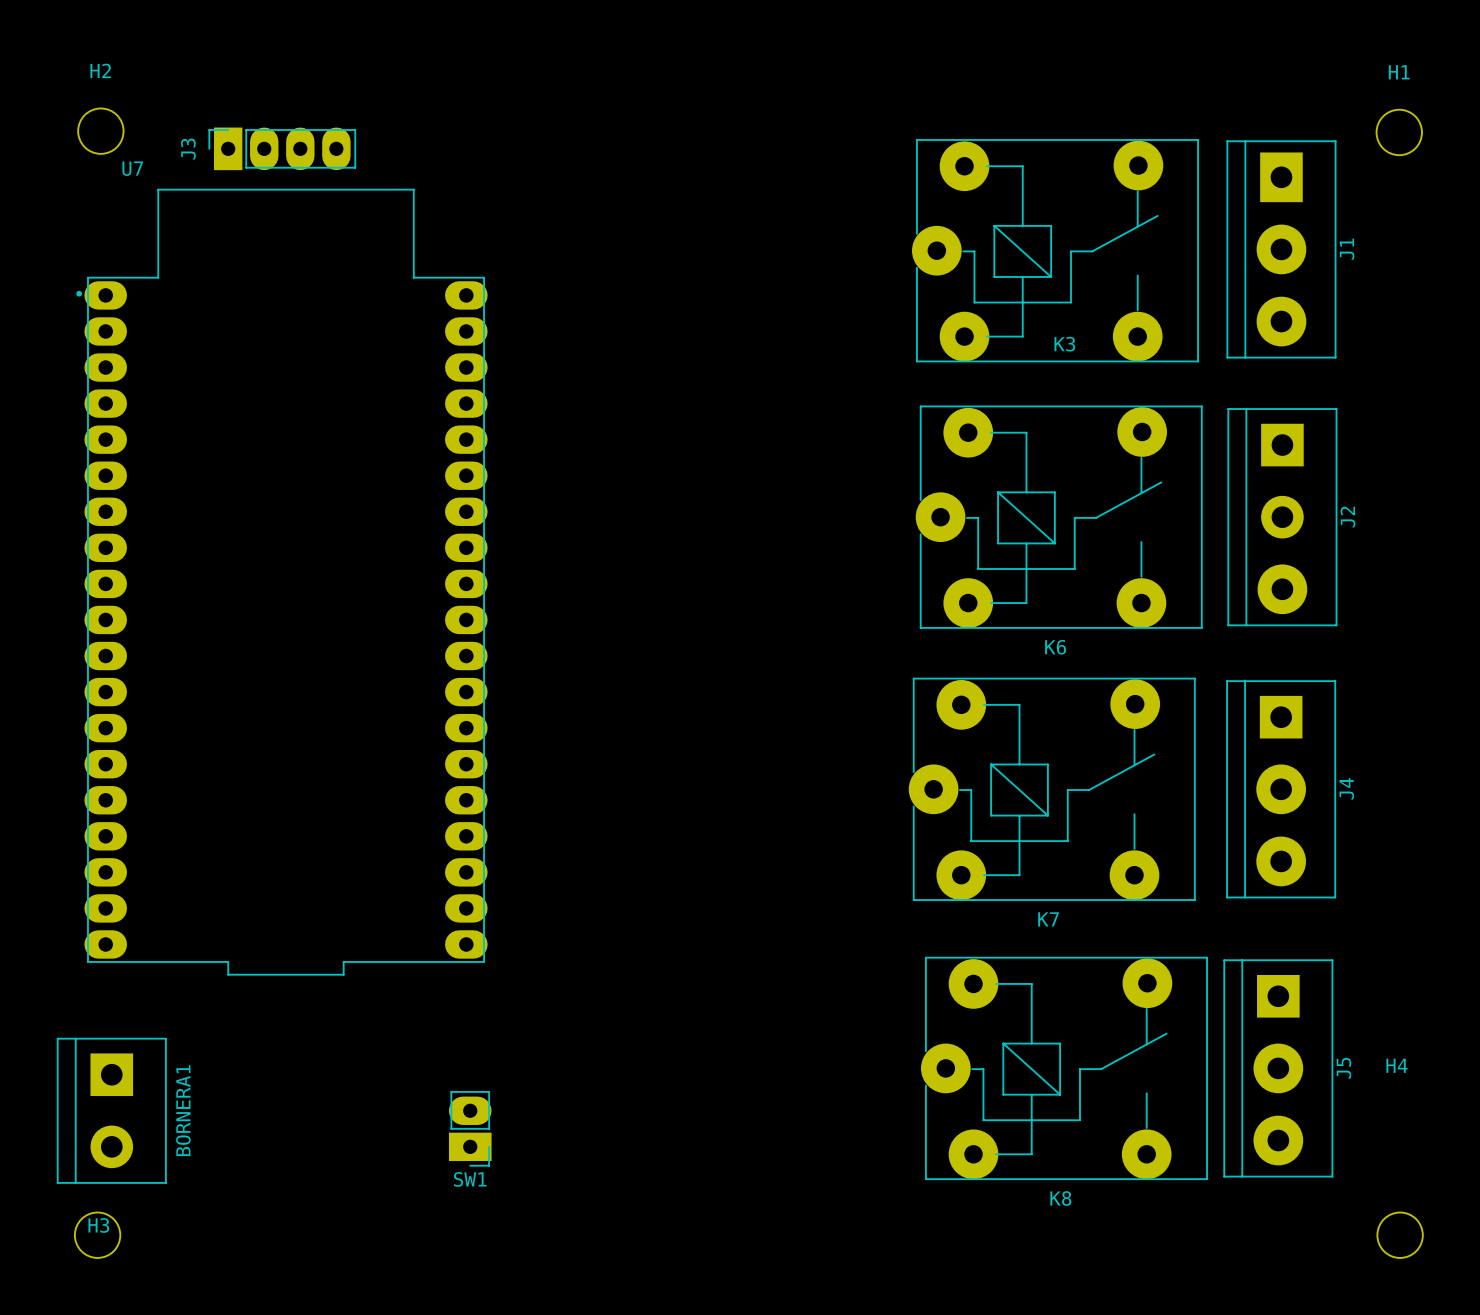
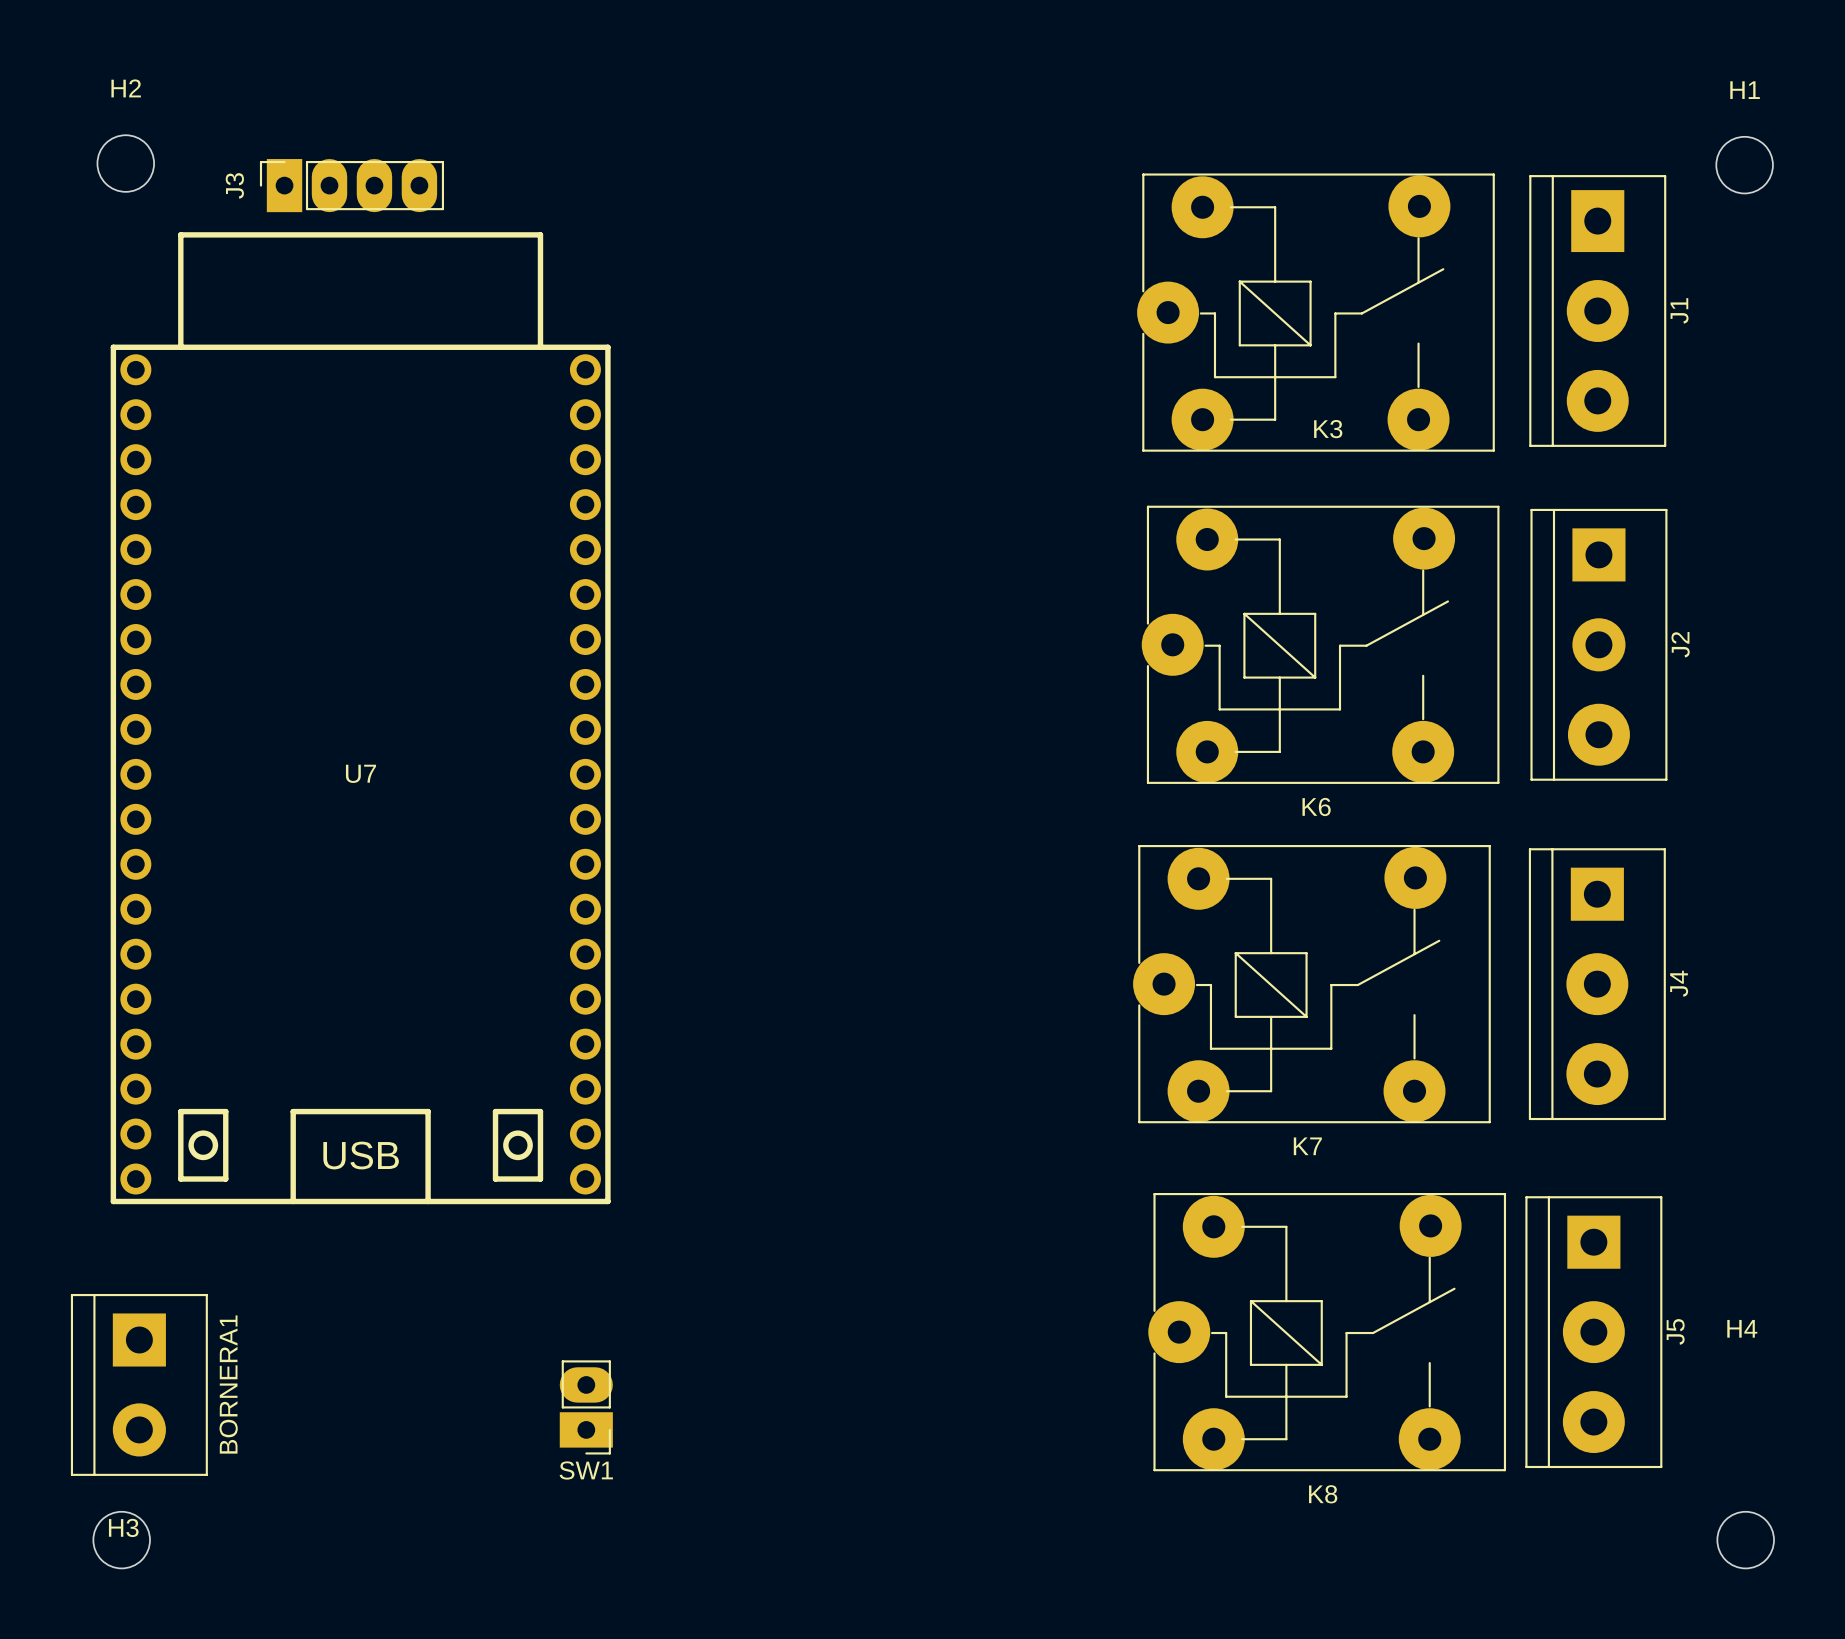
U7 name position: U7 (132, 168) -> U7 (360, 773)
U7 footprint: [76, 188, 488, 976] -> [110, 232, 611, 1205]

